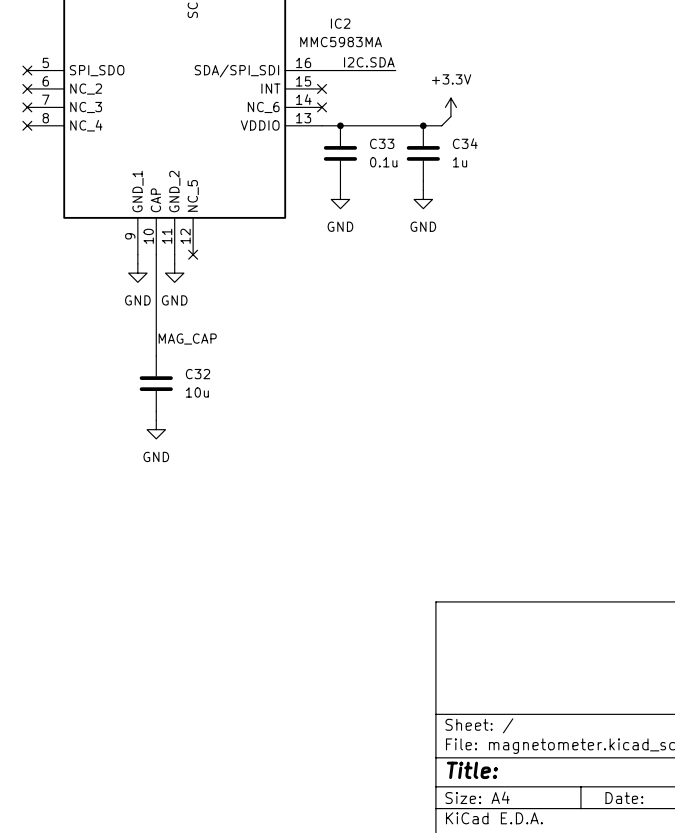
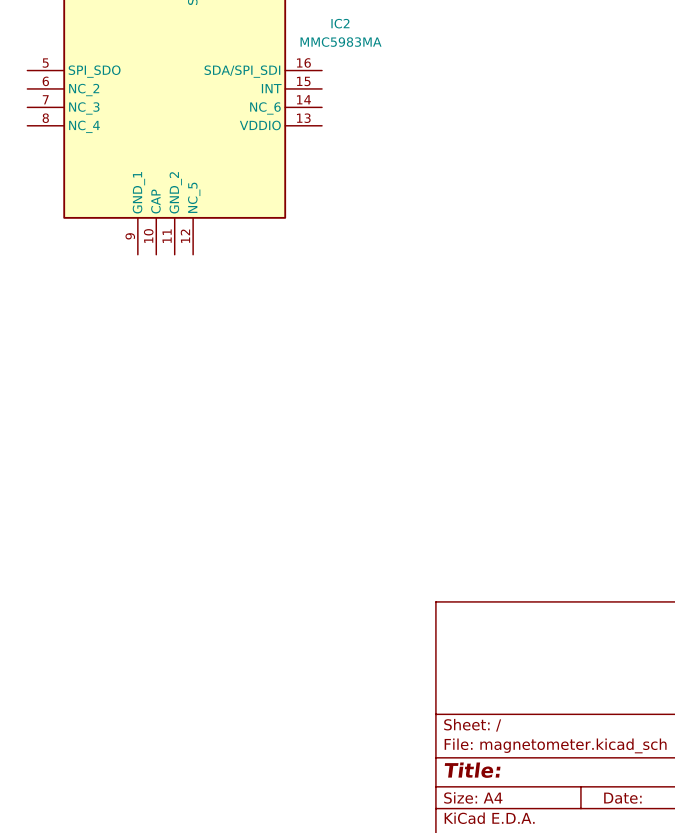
label: I2C.SDA (369, 62) -> none
no-connect mark: (27, 70) -> none
wire: (322, 70) (395, 70) -> none
no-connect mark: (27, 88) -> none
no-connect mark: (322, 88) -> none
no-connect mark: (27, 107) -> none
no-connect mark: (322, 107) -> none
power symbol: +3.3V (450, 107) -> none
wire: (450, 116) (441, 125) (322, 125) -> none
no-connect mark: (27, 125) -> none
junction: (340, 125) -> none
junction: (423, 125) -> none
C33: 0.1u (340, 153) -> none
C34: 1u (423, 153) -> none
wire: (340, 181) (340, 190) -> none
wire: (423, 181) (423, 190) -> none
power symbol: GND (340, 199) -> none
power symbol: GND (423, 199) -> none
wire: (137, 254) (137, 263) -> none
wire: (156, 254) (156, 356) -> none
wire: (174, 254) (174, 263) -> none
no-connect mark: (193, 254) -> none
power symbol: GND (137, 273) -> none
power symbol: GND (174, 273) -> none
label: MAG_CAP (187, 339) -> none
C32: 10u (156, 383) -> none
wire: (156, 411) (156, 420) -> none
power symbol: GND (156, 429) -> none

